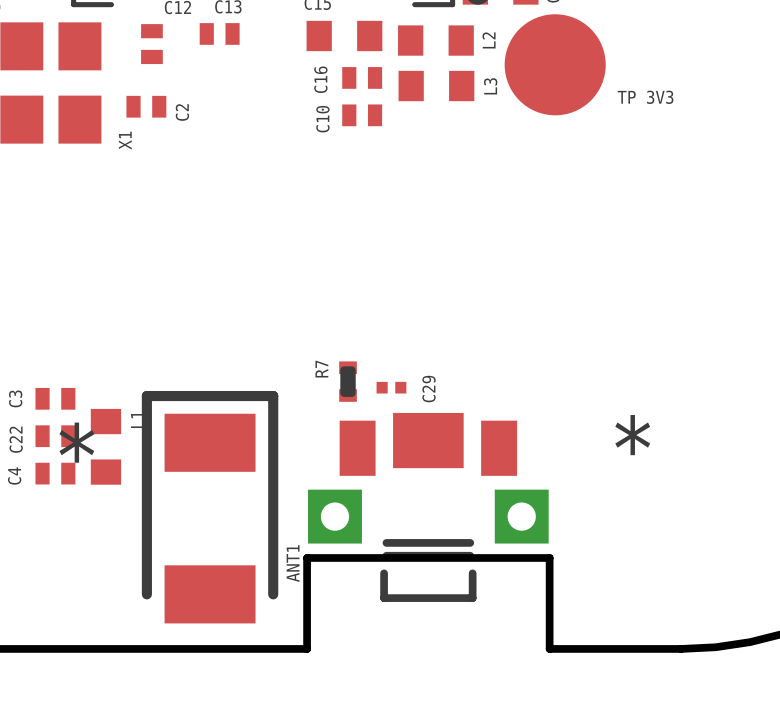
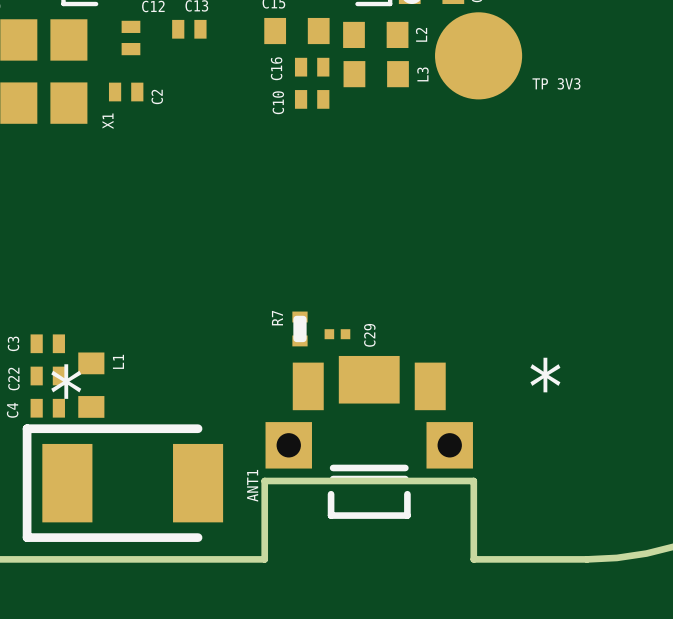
part rotation: 0° (210, 507) -> 90° counterclockwise (122, 483)

